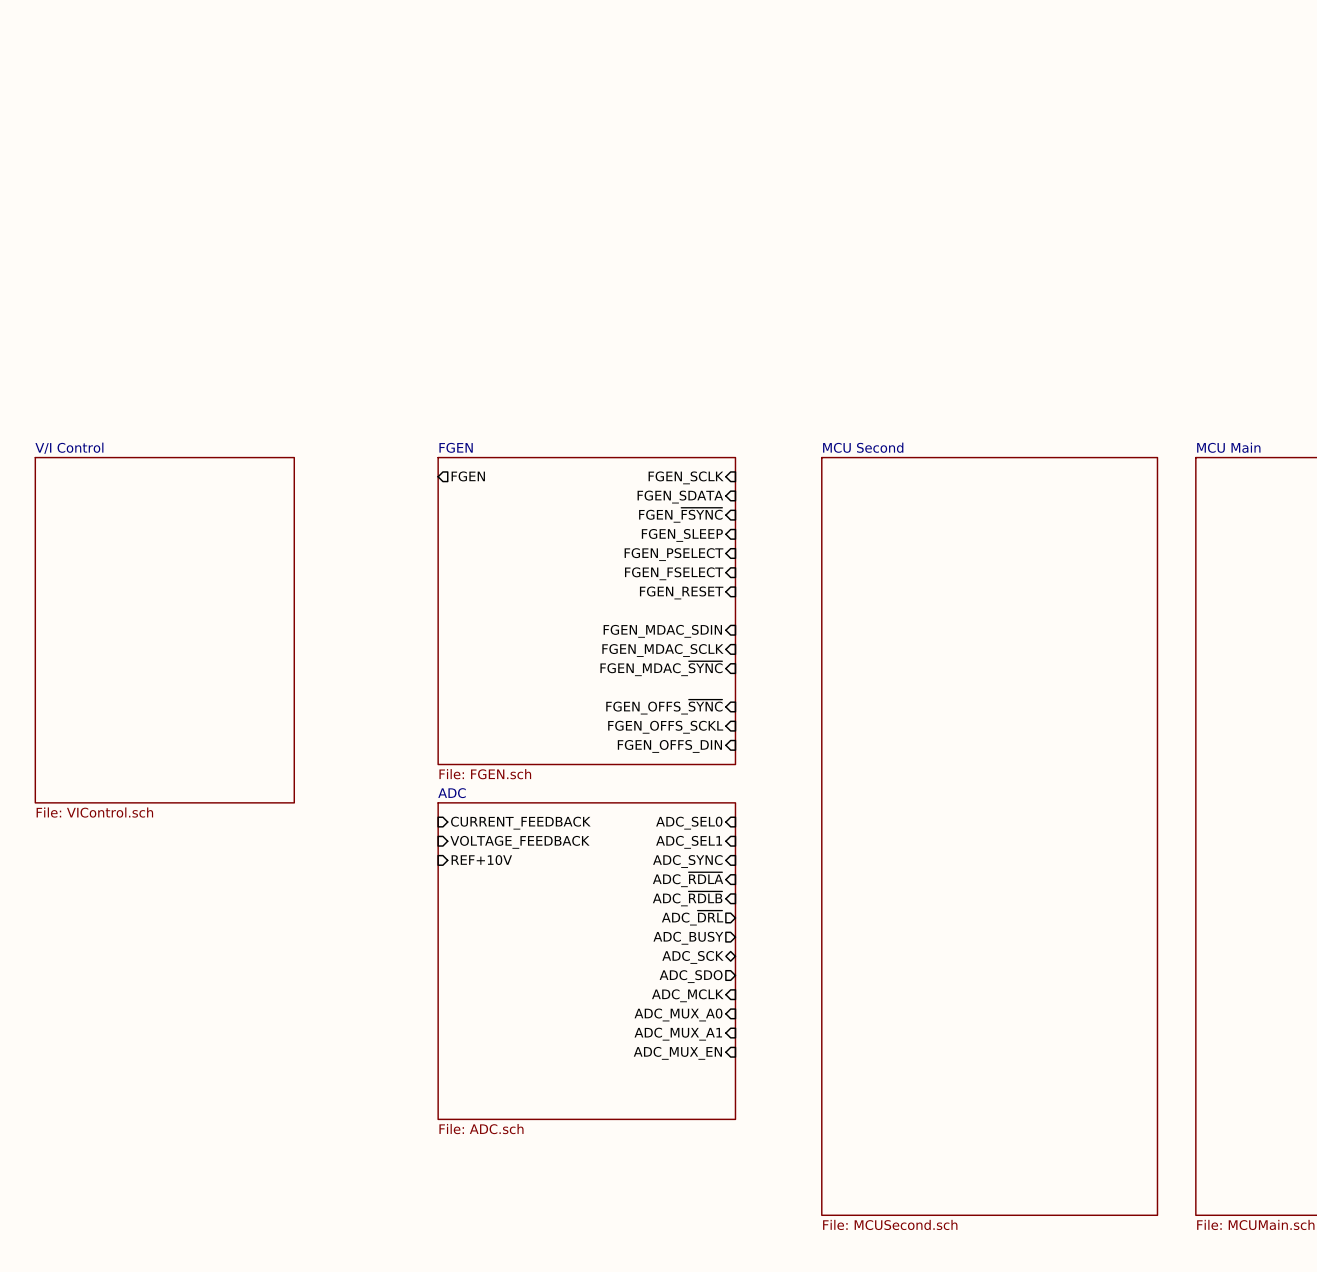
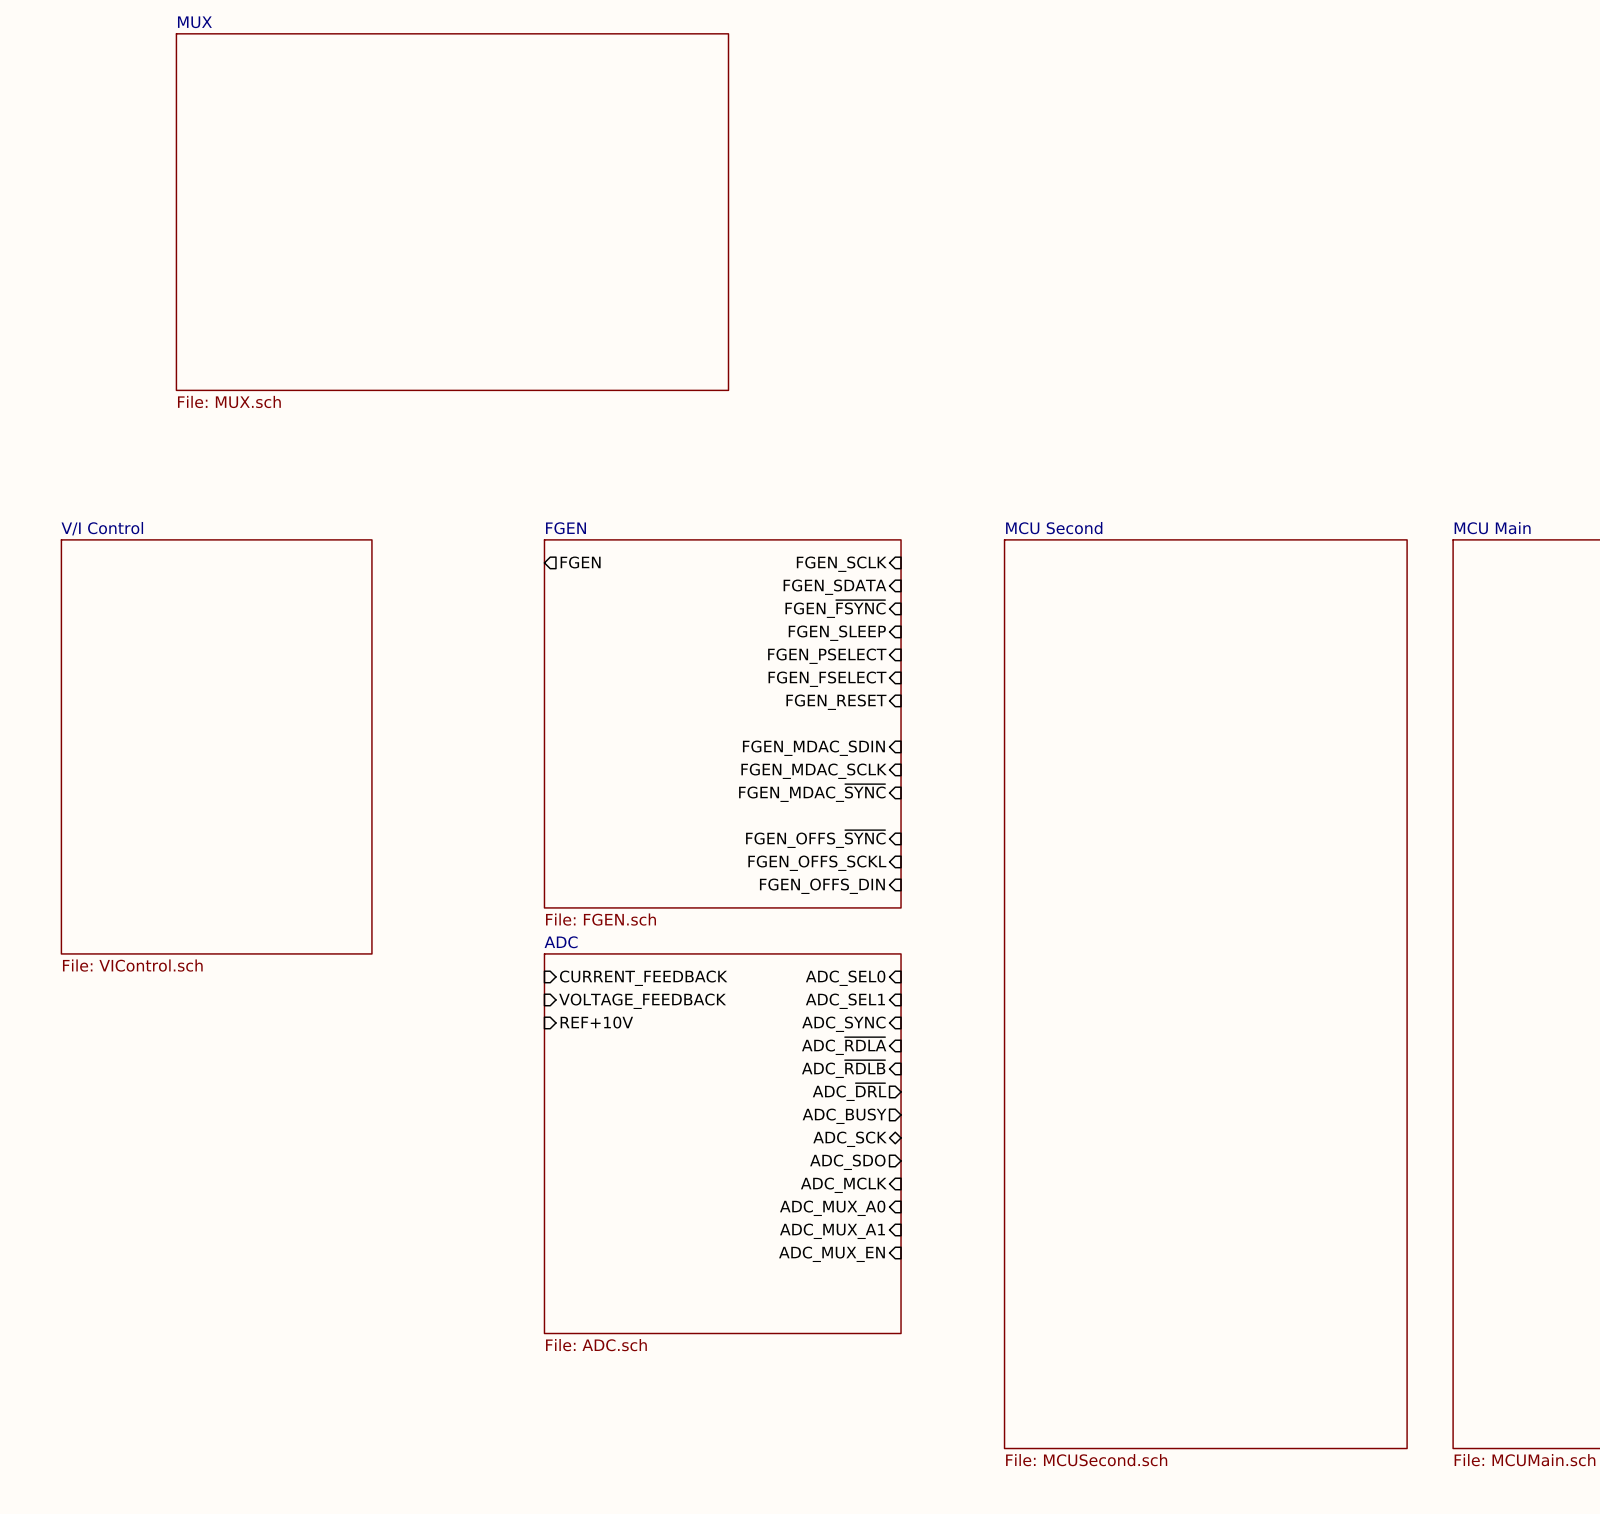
sheet MUX: none -> File: MUX.sch (452, 212)

